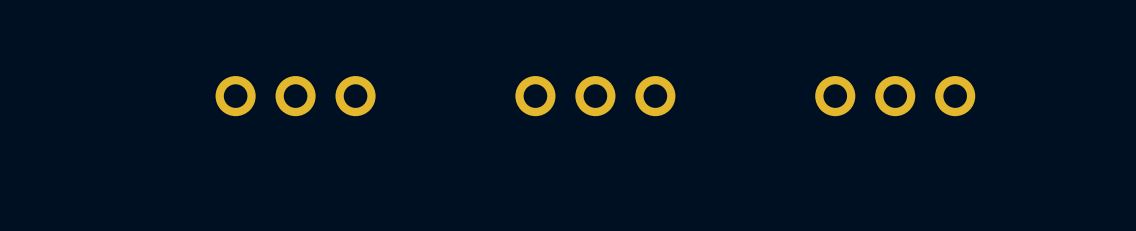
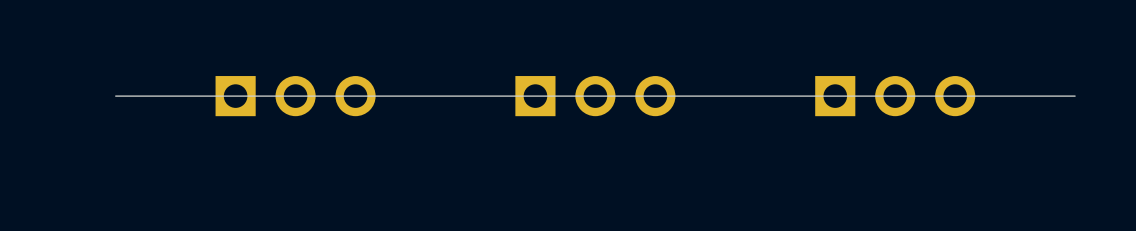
part footprint: [215, 76, 376, 117] -> [215, 76, 376, 117]
part footprint: [515, 76, 676, 117] -> [515, 76, 676, 117]
part footprint: [815, 76, 976, 117] -> [815, 76, 976, 117]
board edge: none -> (1075, 96) (115, 96)

